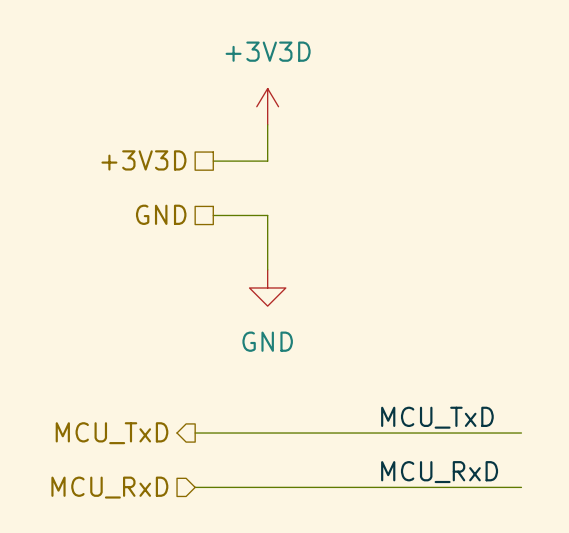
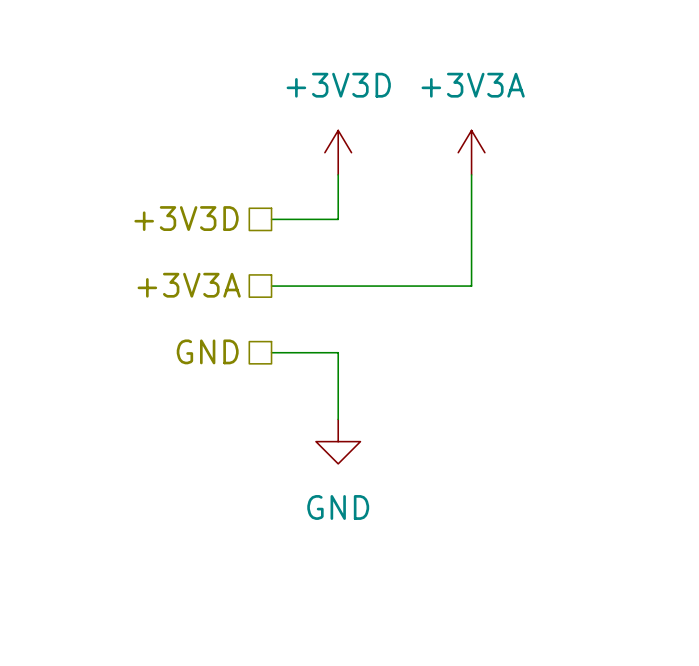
power symbol: none -> +3V3A (471, 152)
hierarchical label: GND (161, 214) -> +3V3A (189, 285)
wire: (267, 215) (267, 269) -> (338, 286) (471, 286) (471, 174)
hierarchical label: none -> GND (207, 351)
wire: none -> (271, 352) (338, 352) (338, 419)
power symbol position: GND (267, 287) -> GND (338, 441)
label: MCU_TxD (437, 417) -> none
hierarchical label: MCU_TxD (112, 433) -> none
wire: (195, 433) (521, 433) -> none
label: MCU_RxD (439, 472) -> none
hierarchical label: MCU_RxD (109, 487) -> none
wire: (195, 487) (521, 487) -> none

